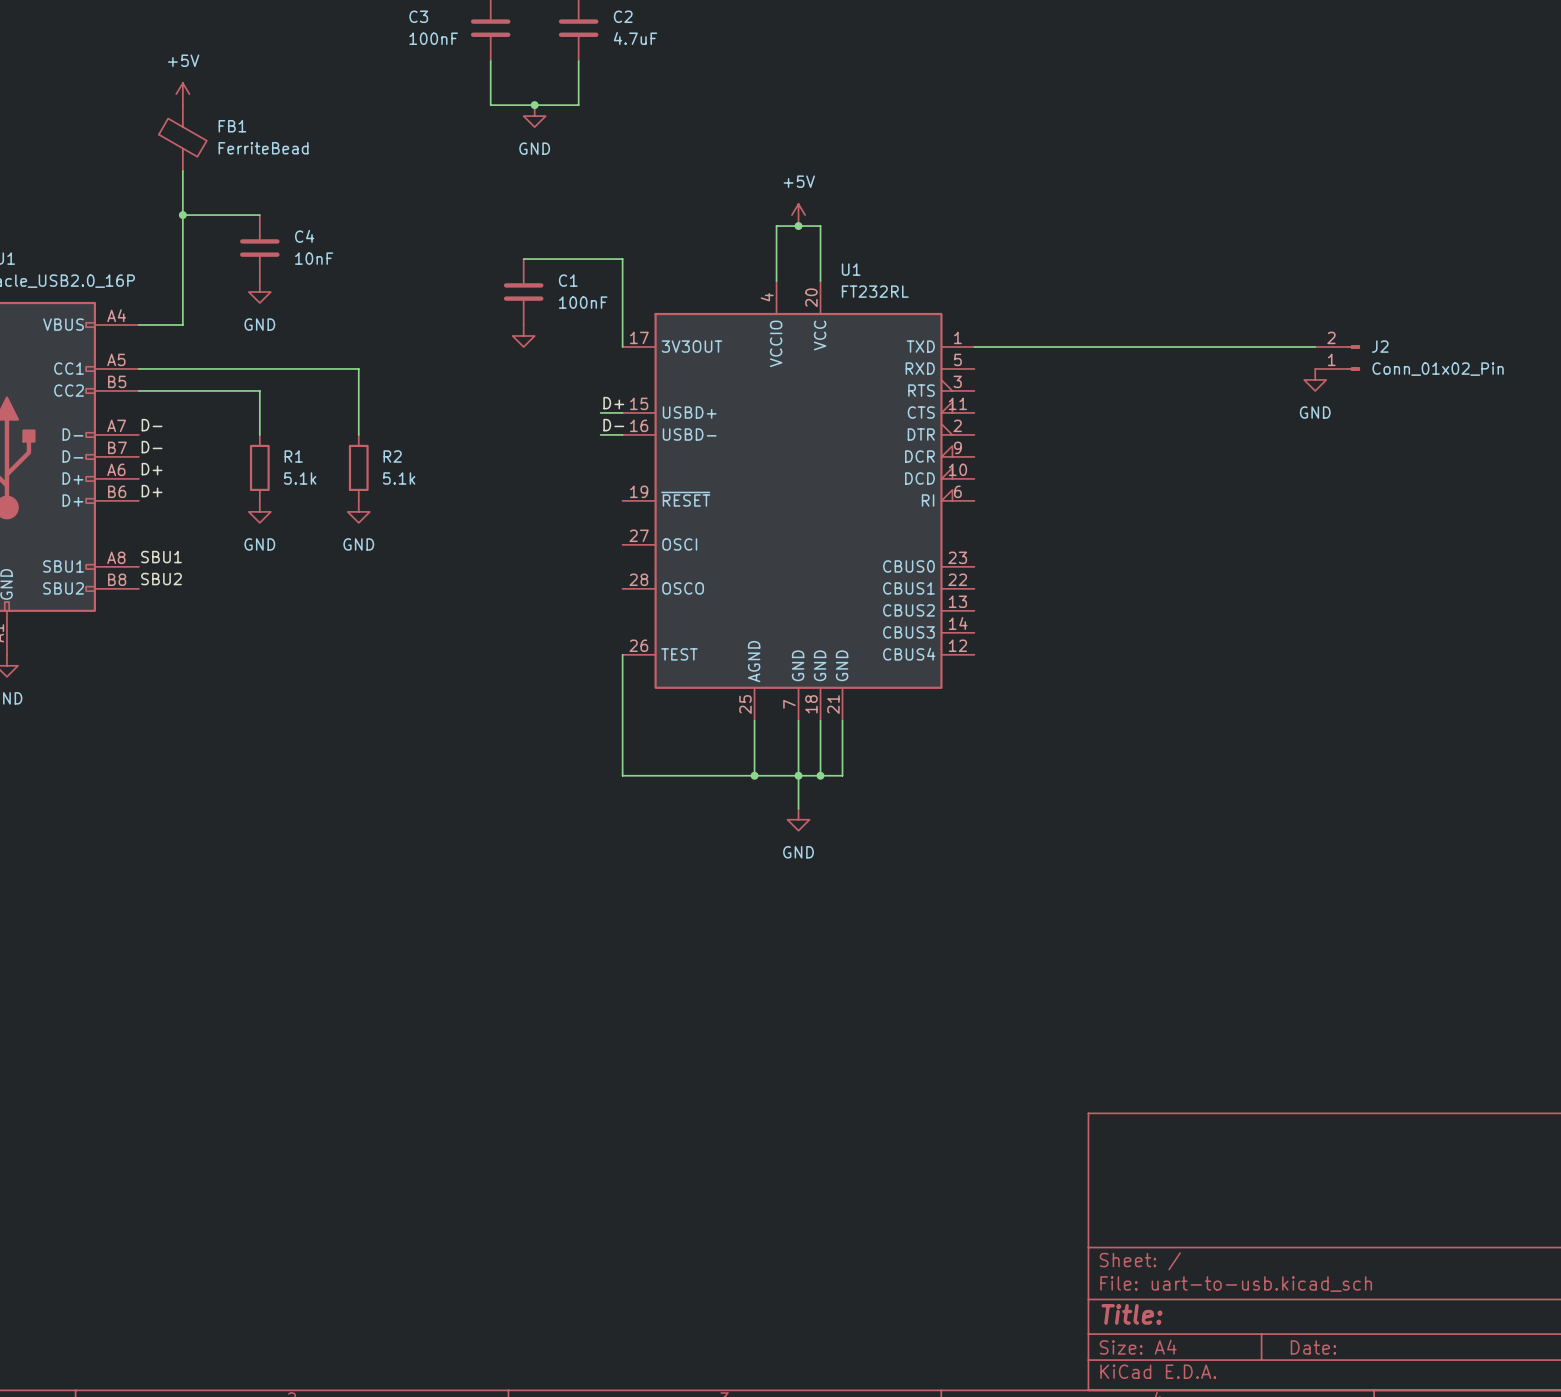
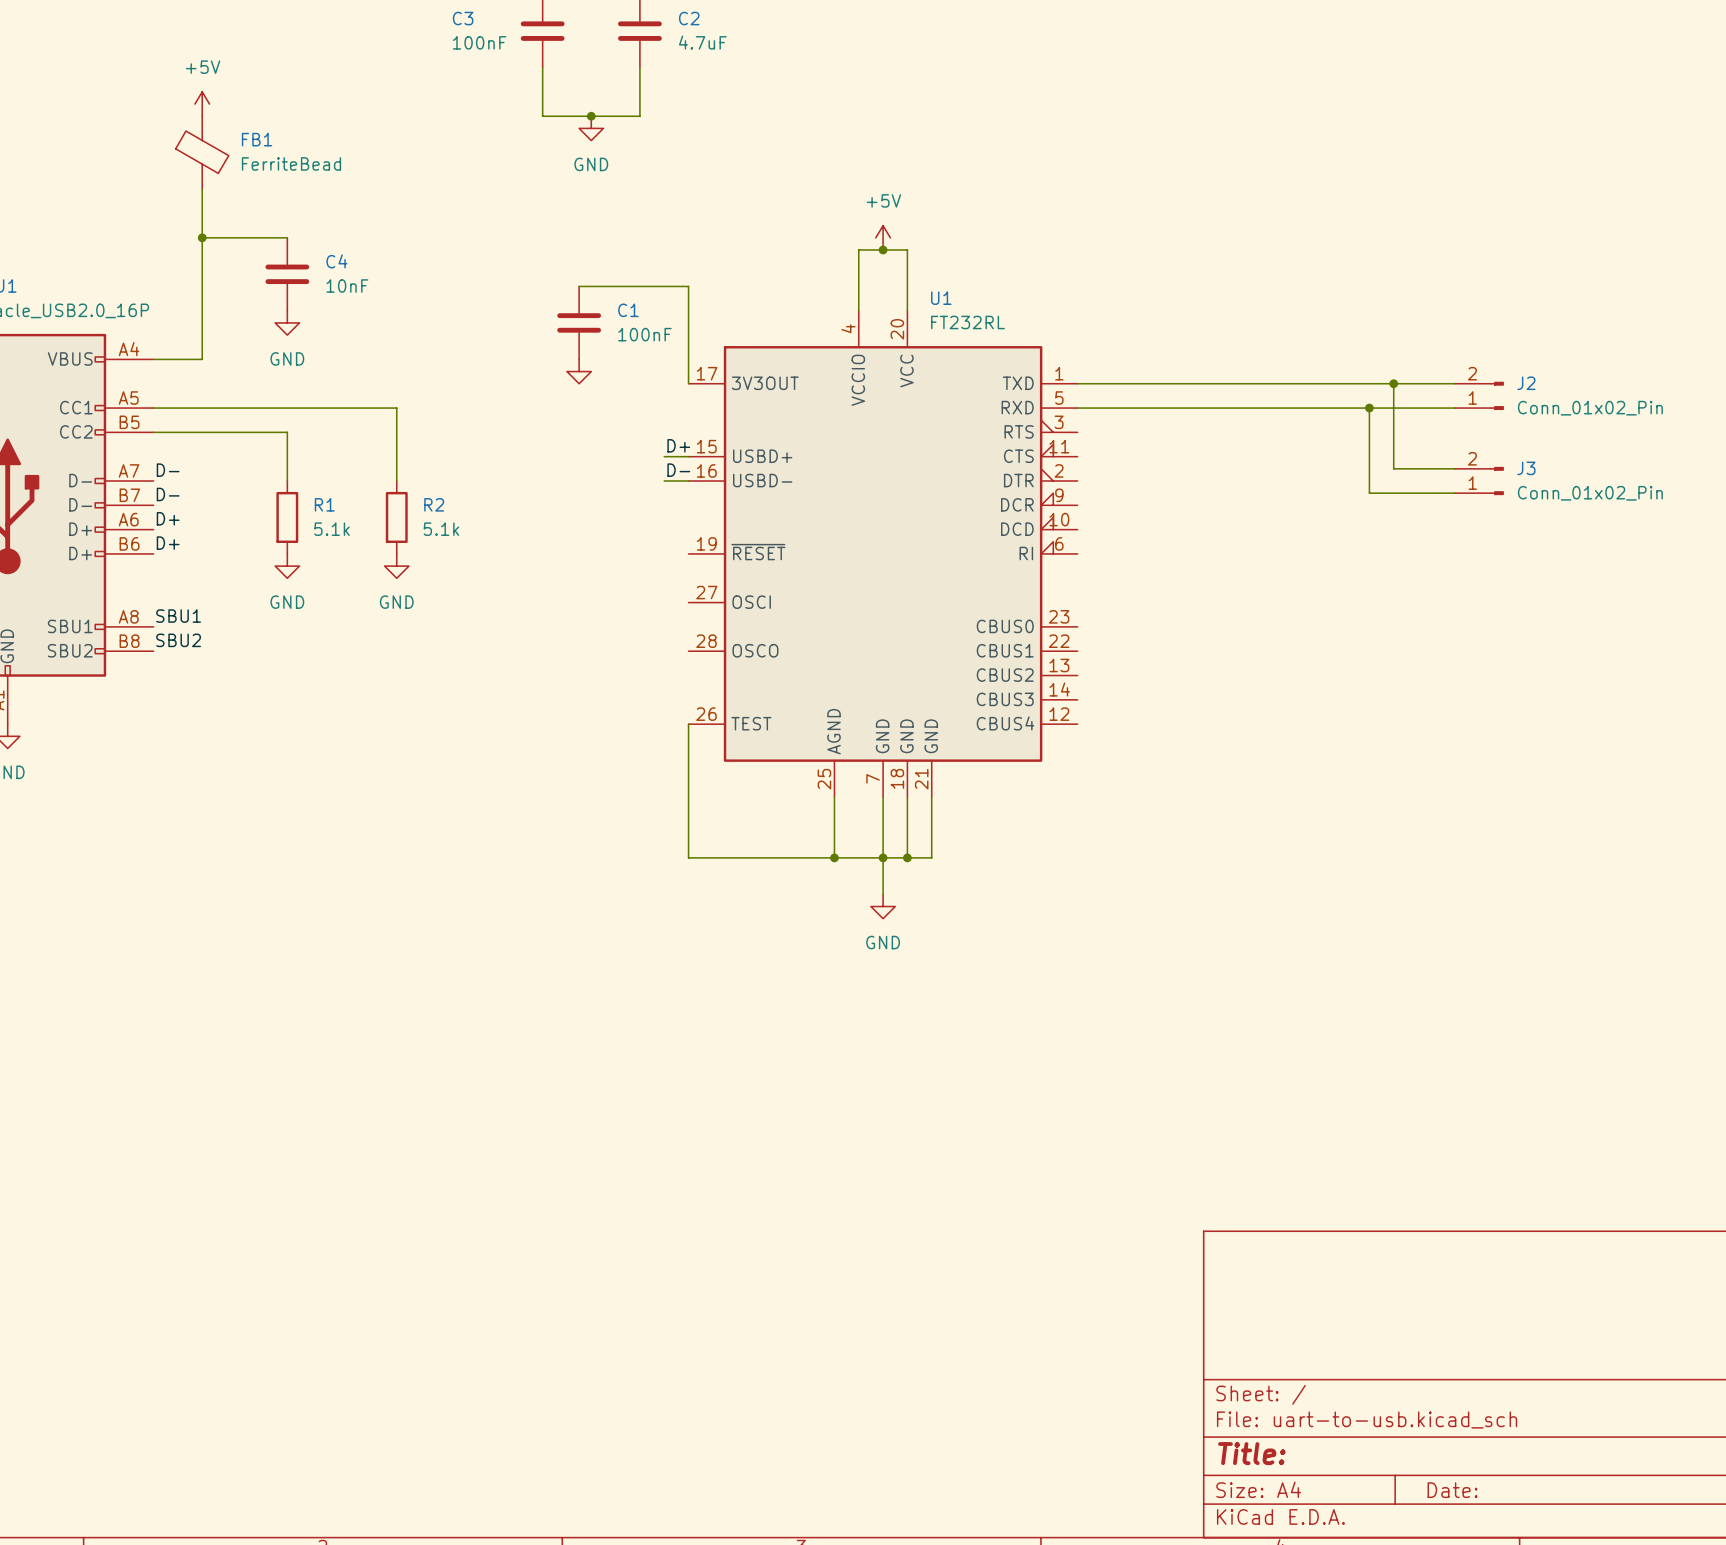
wire: none -> (1393, 383) (1393, 468) (1454, 468)
junction: none -> (1393, 383)
wire: none -> (1077, 408) (1454, 408)
wire: none -> (1369, 408) (1369, 493) (1454, 493)
junction: none -> (1369, 408)
power symbol: GND (1315, 379) -> none
J3: none -> Conn_01x02_Pin (1479, 480)

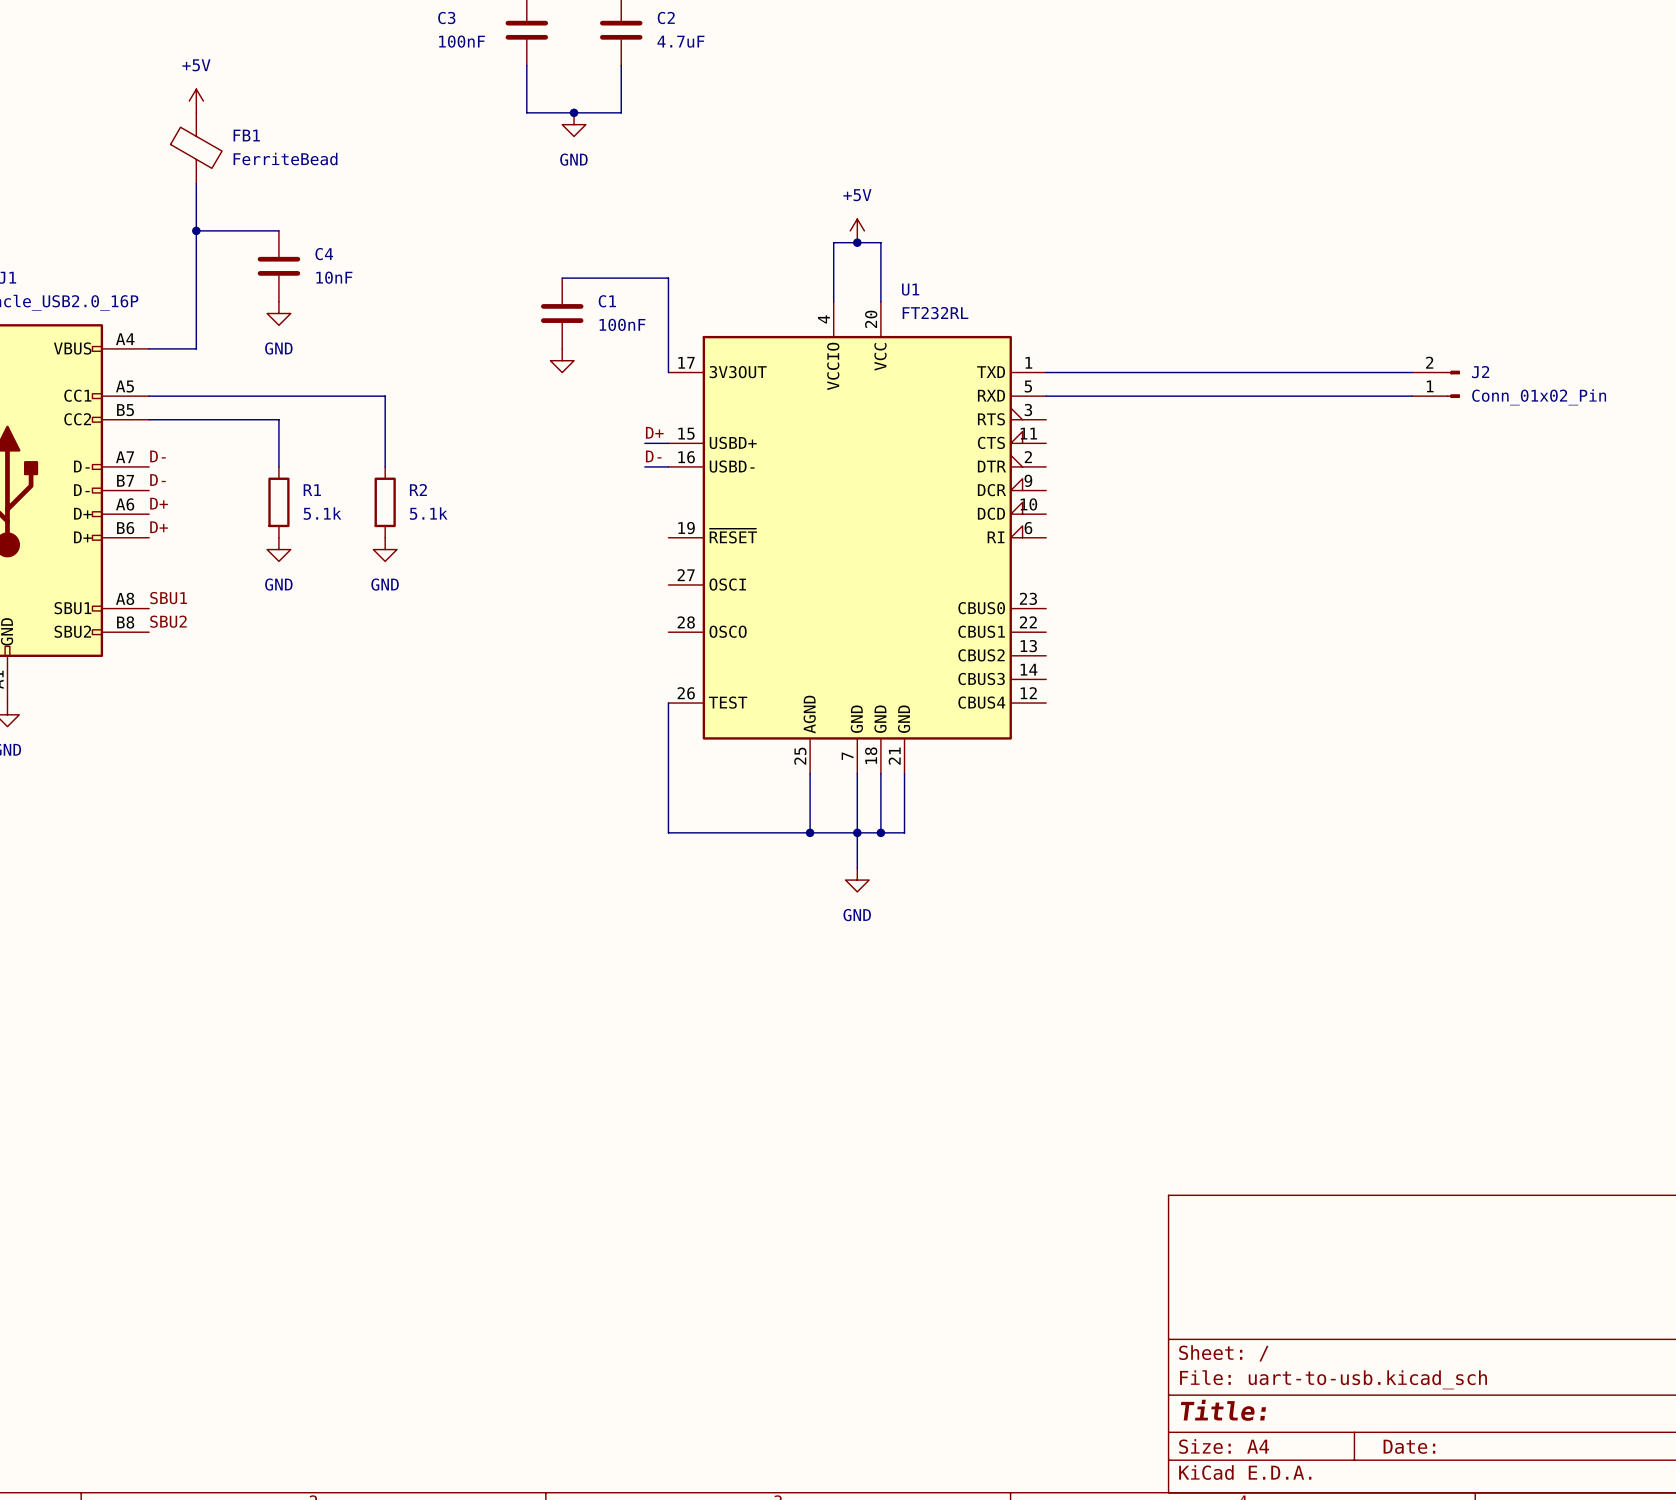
wire: (1393, 383) (1393, 468) (1454, 468) -> none
junction: (1393, 383) -> none
wire: (1369, 408) (1369, 493) (1454, 493) -> none
junction: (1369, 408) -> none
J3: Conn_01x02_Pin (1479, 480) -> none

